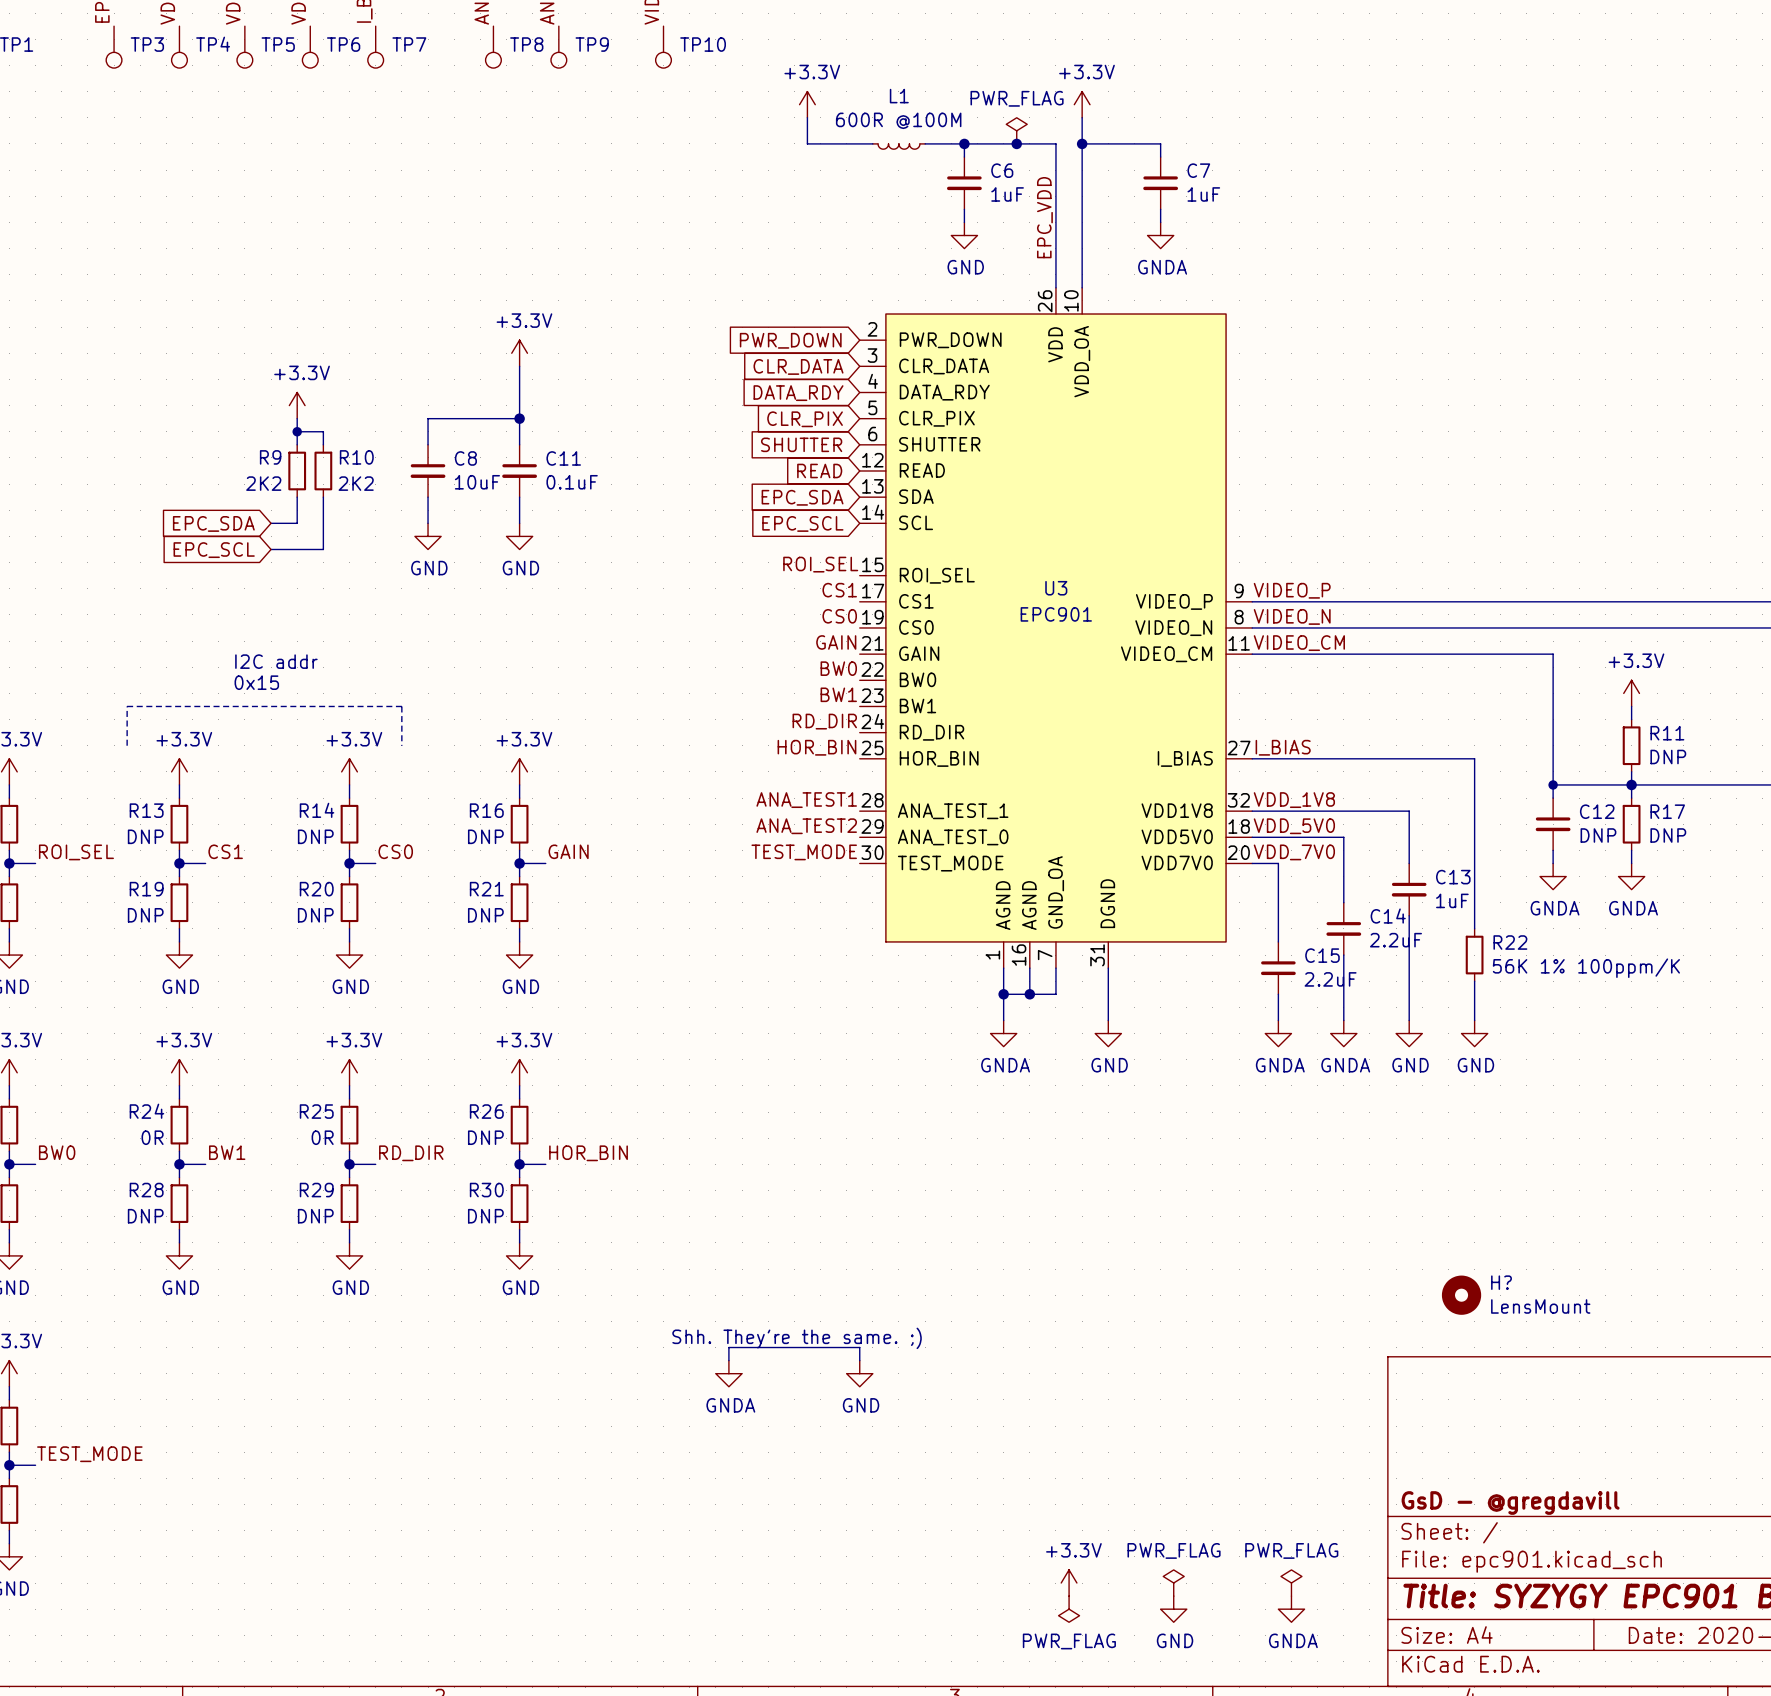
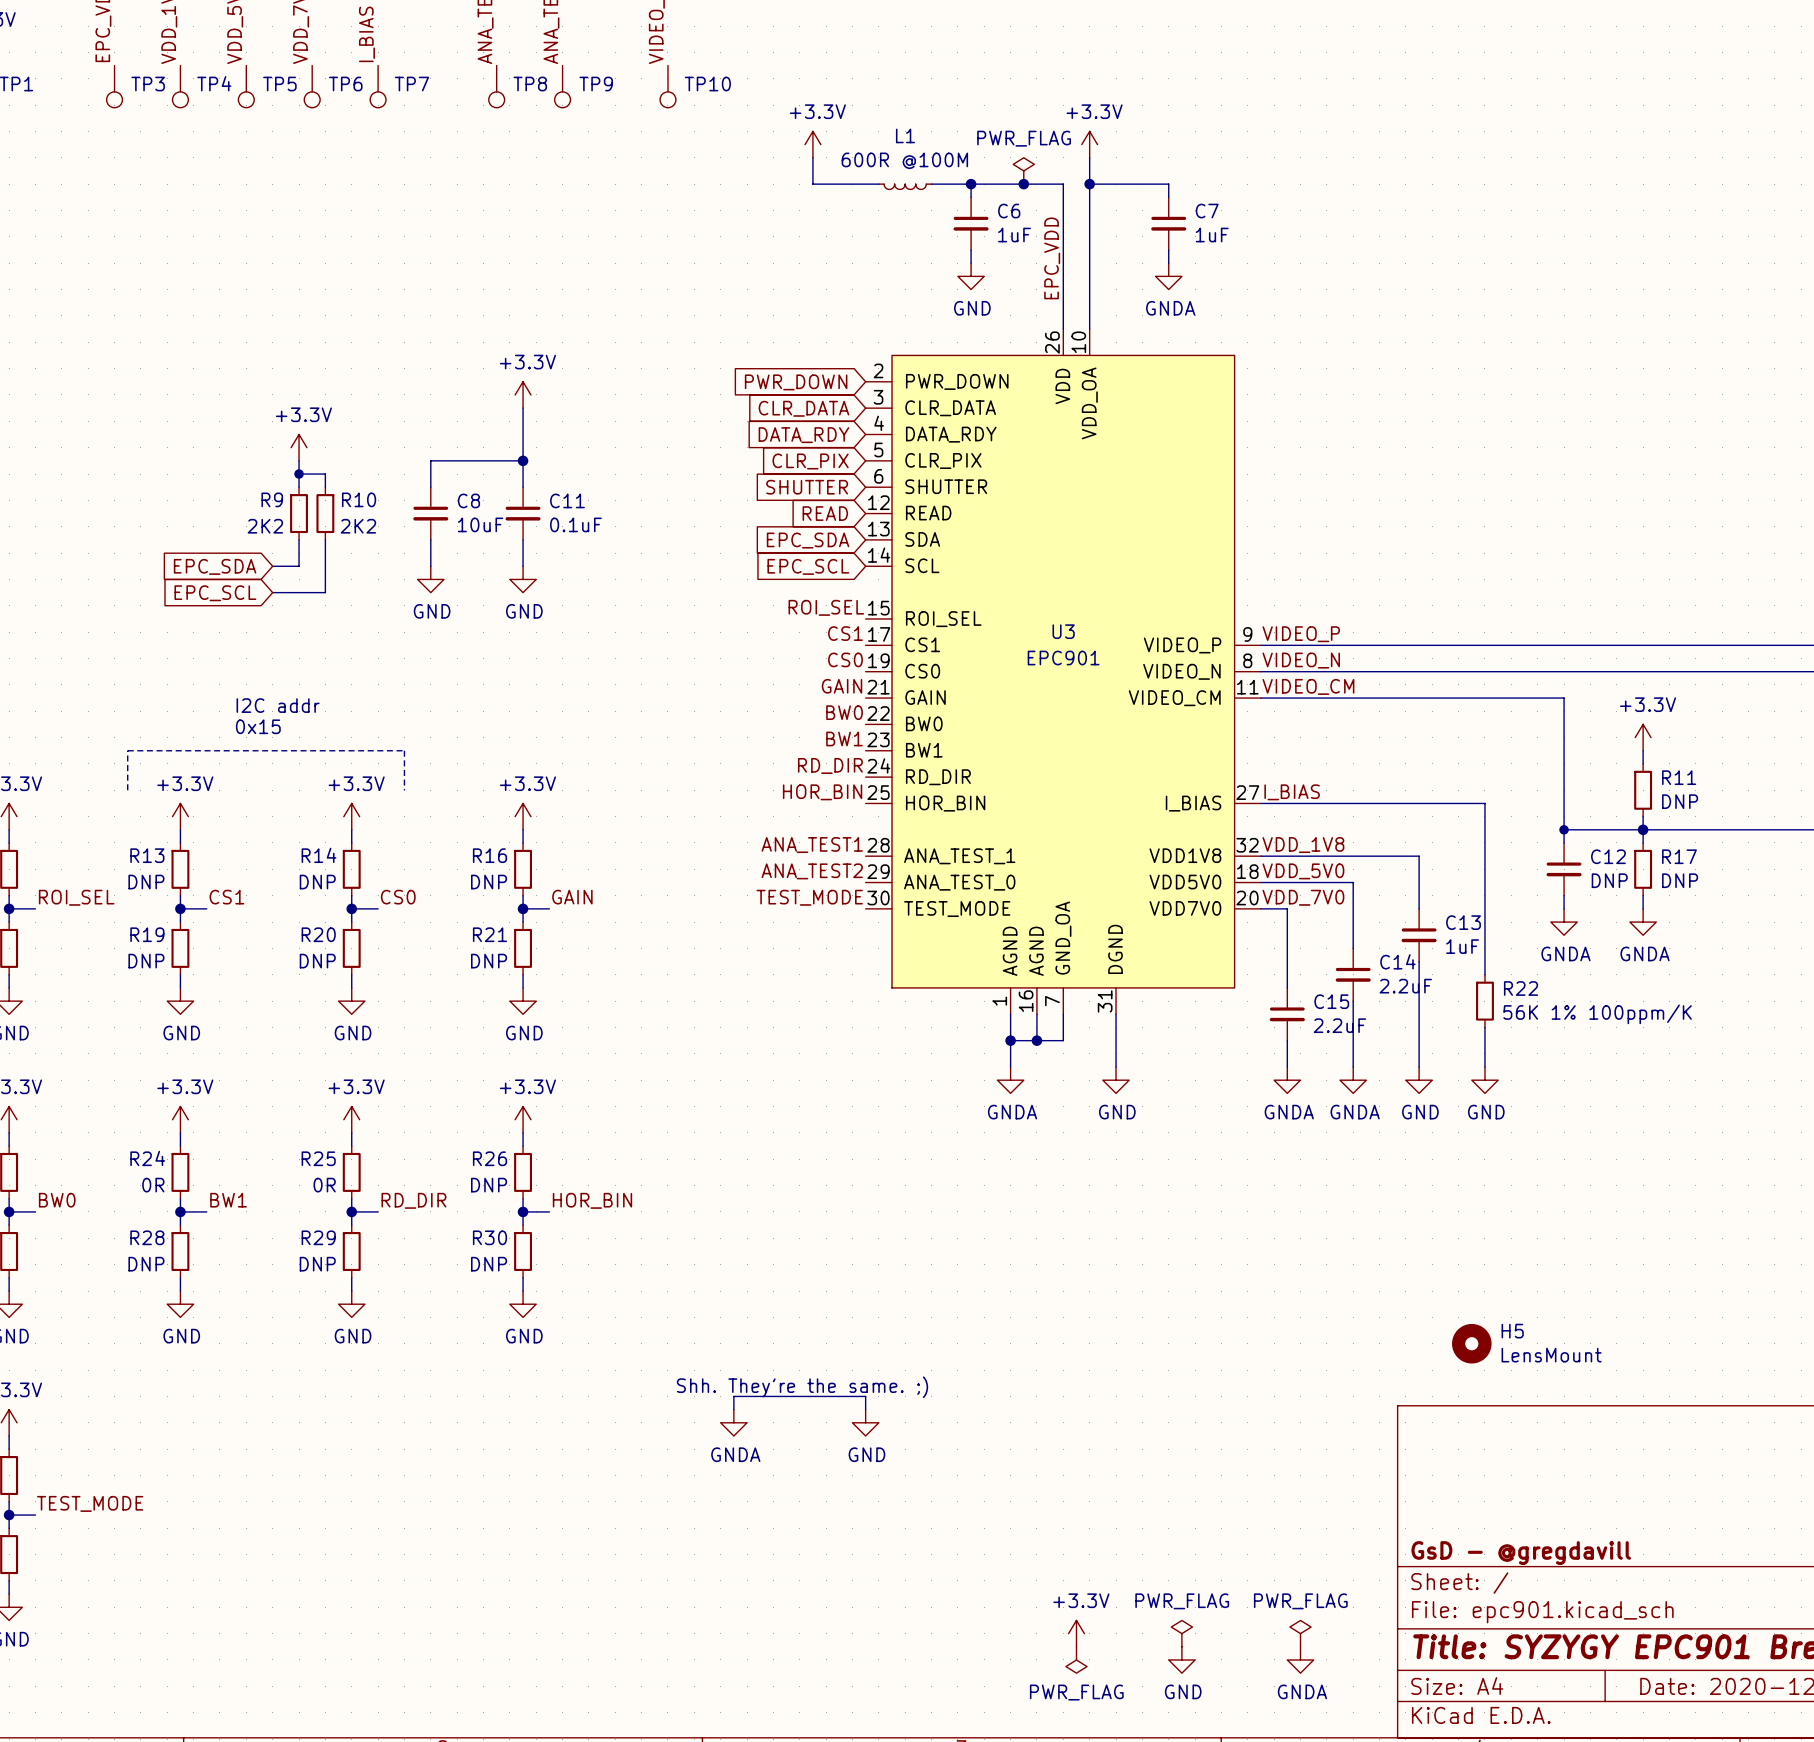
H? name: H? (1501, 1282) -> H5 (1512, 1331)

